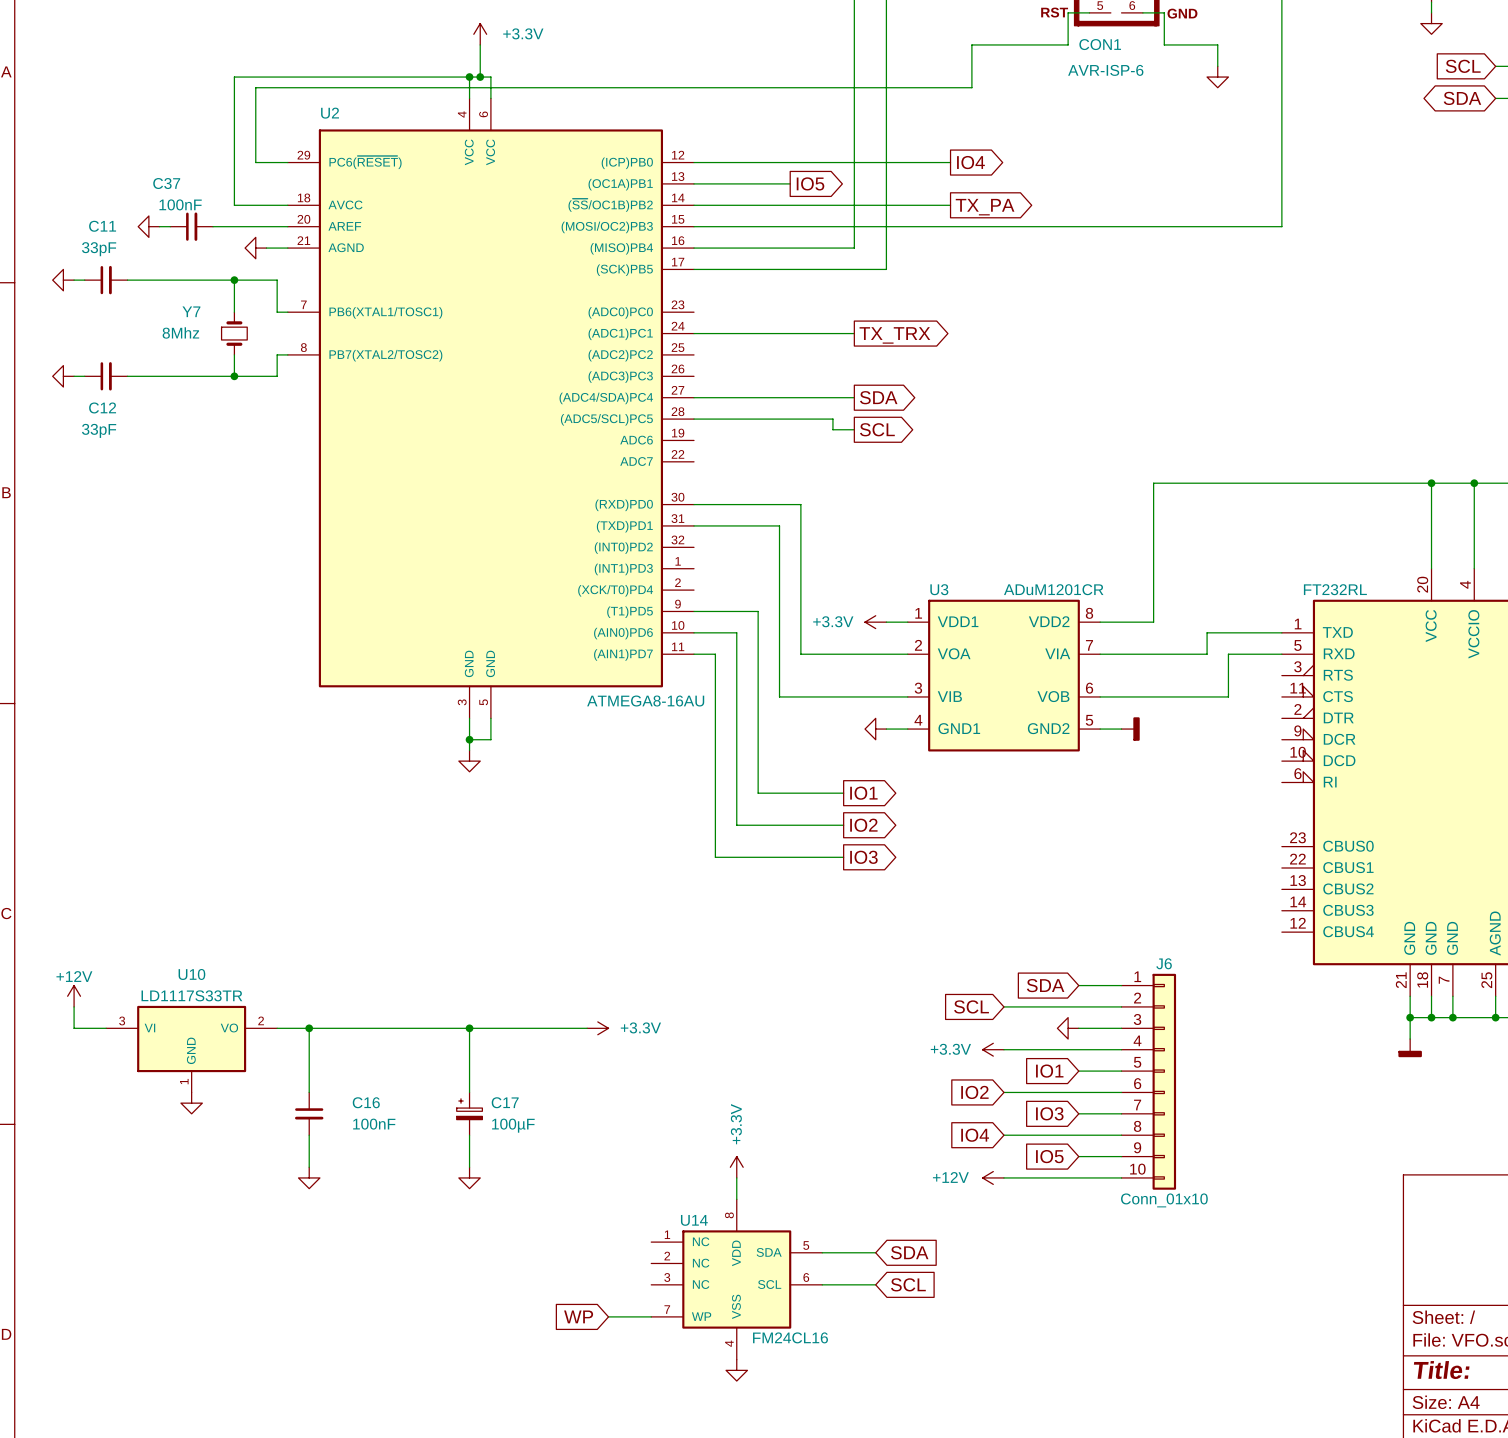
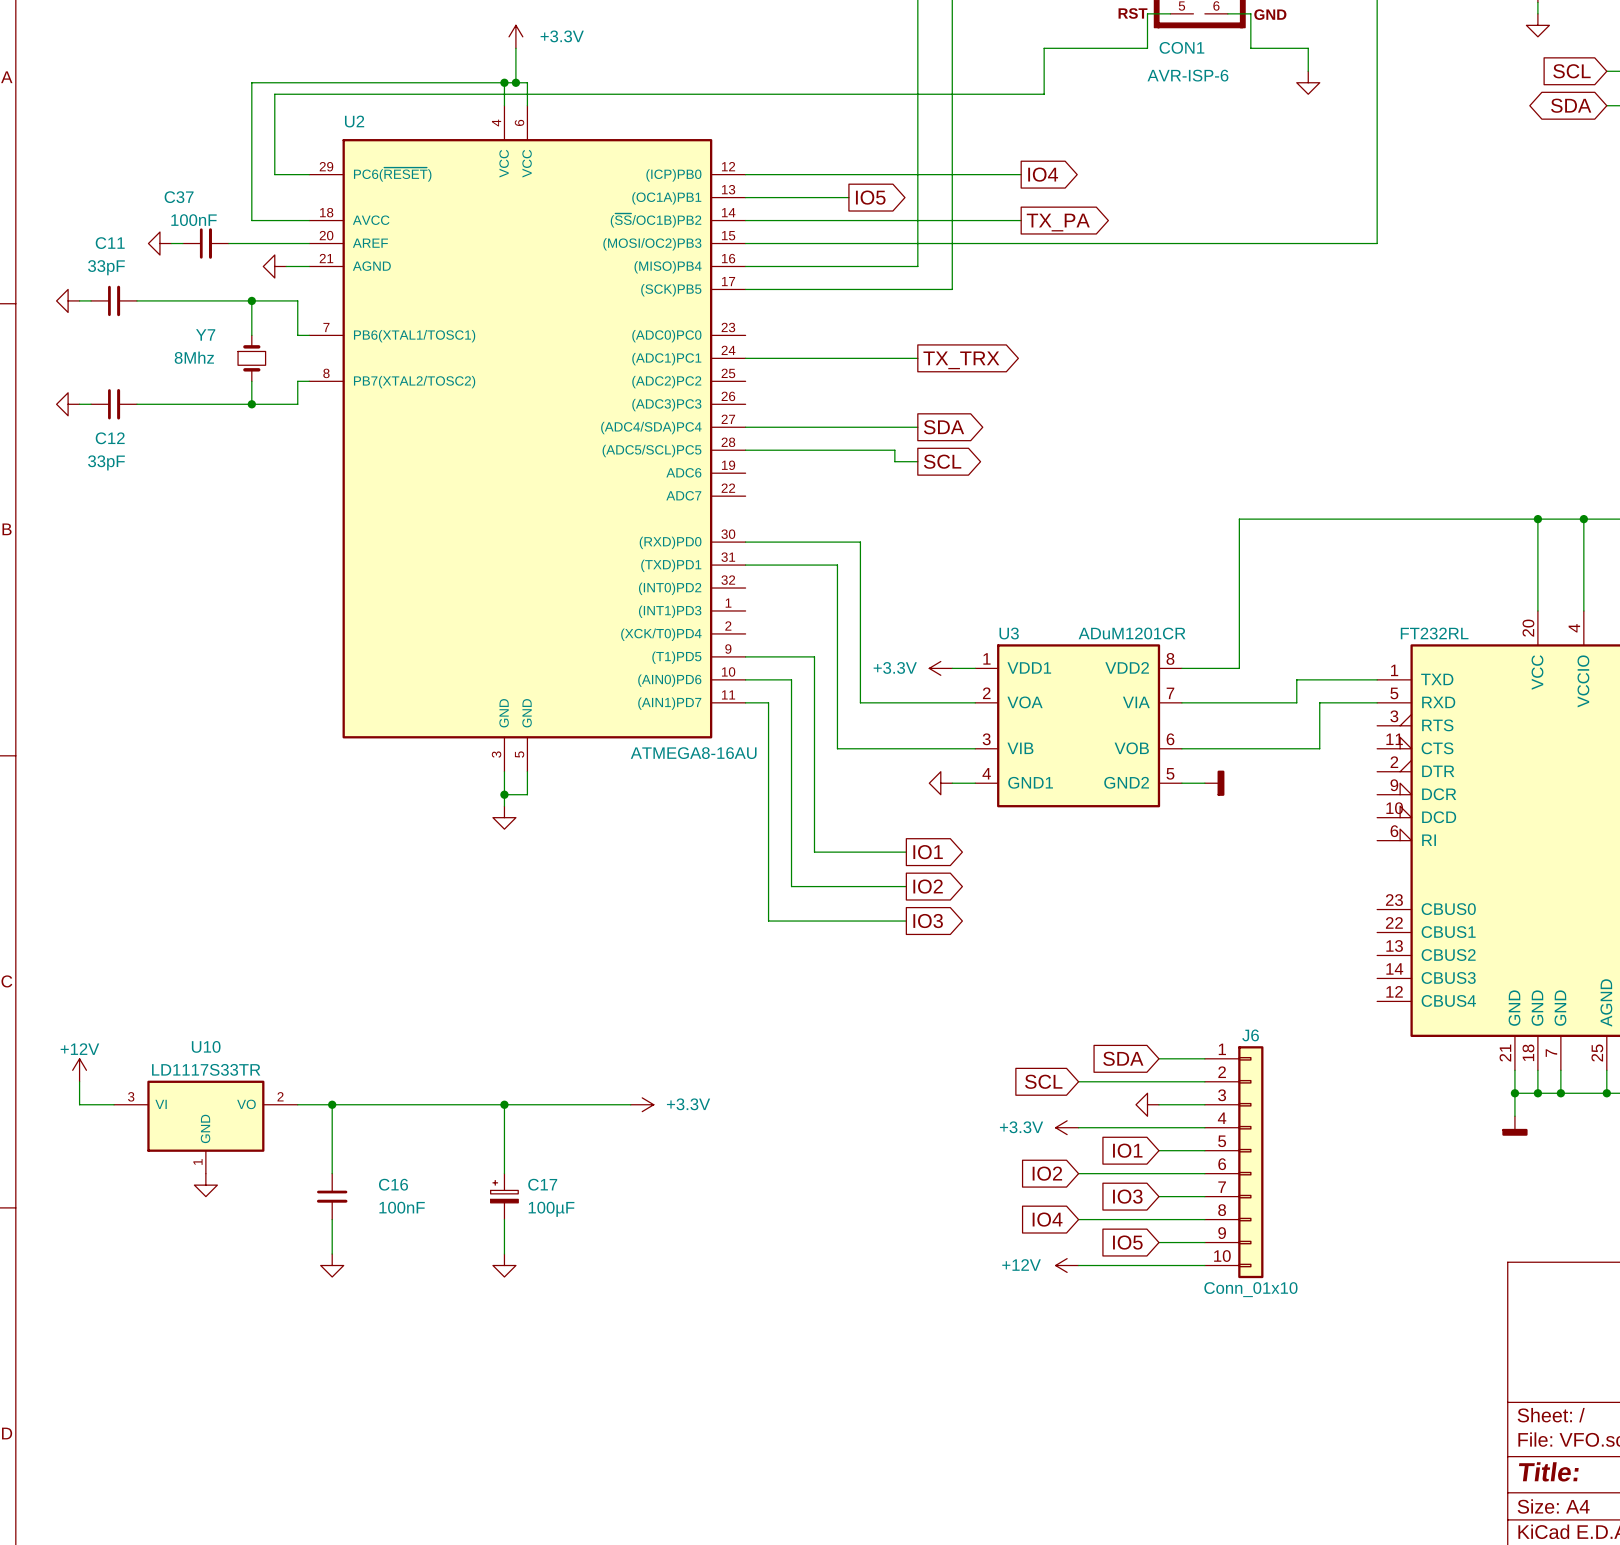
power symbol: +3.3V (736, 1167) -> none
wire: (736, 1177) (736, 1199) -> none
wire: (822, 1252) (875, 1252) -> none
global label: SDA (909, 1252) -> none
U14: FM24CL16 (736, 1279) -> none
wire: (822, 1284) (875, 1284) -> none
global label: SCL (908, 1284) -> none
global label: WP (578, 1316) -> none
wire: (608, 1316) (651, 1316) -> none
power symbol: (736, 1370) -> none

